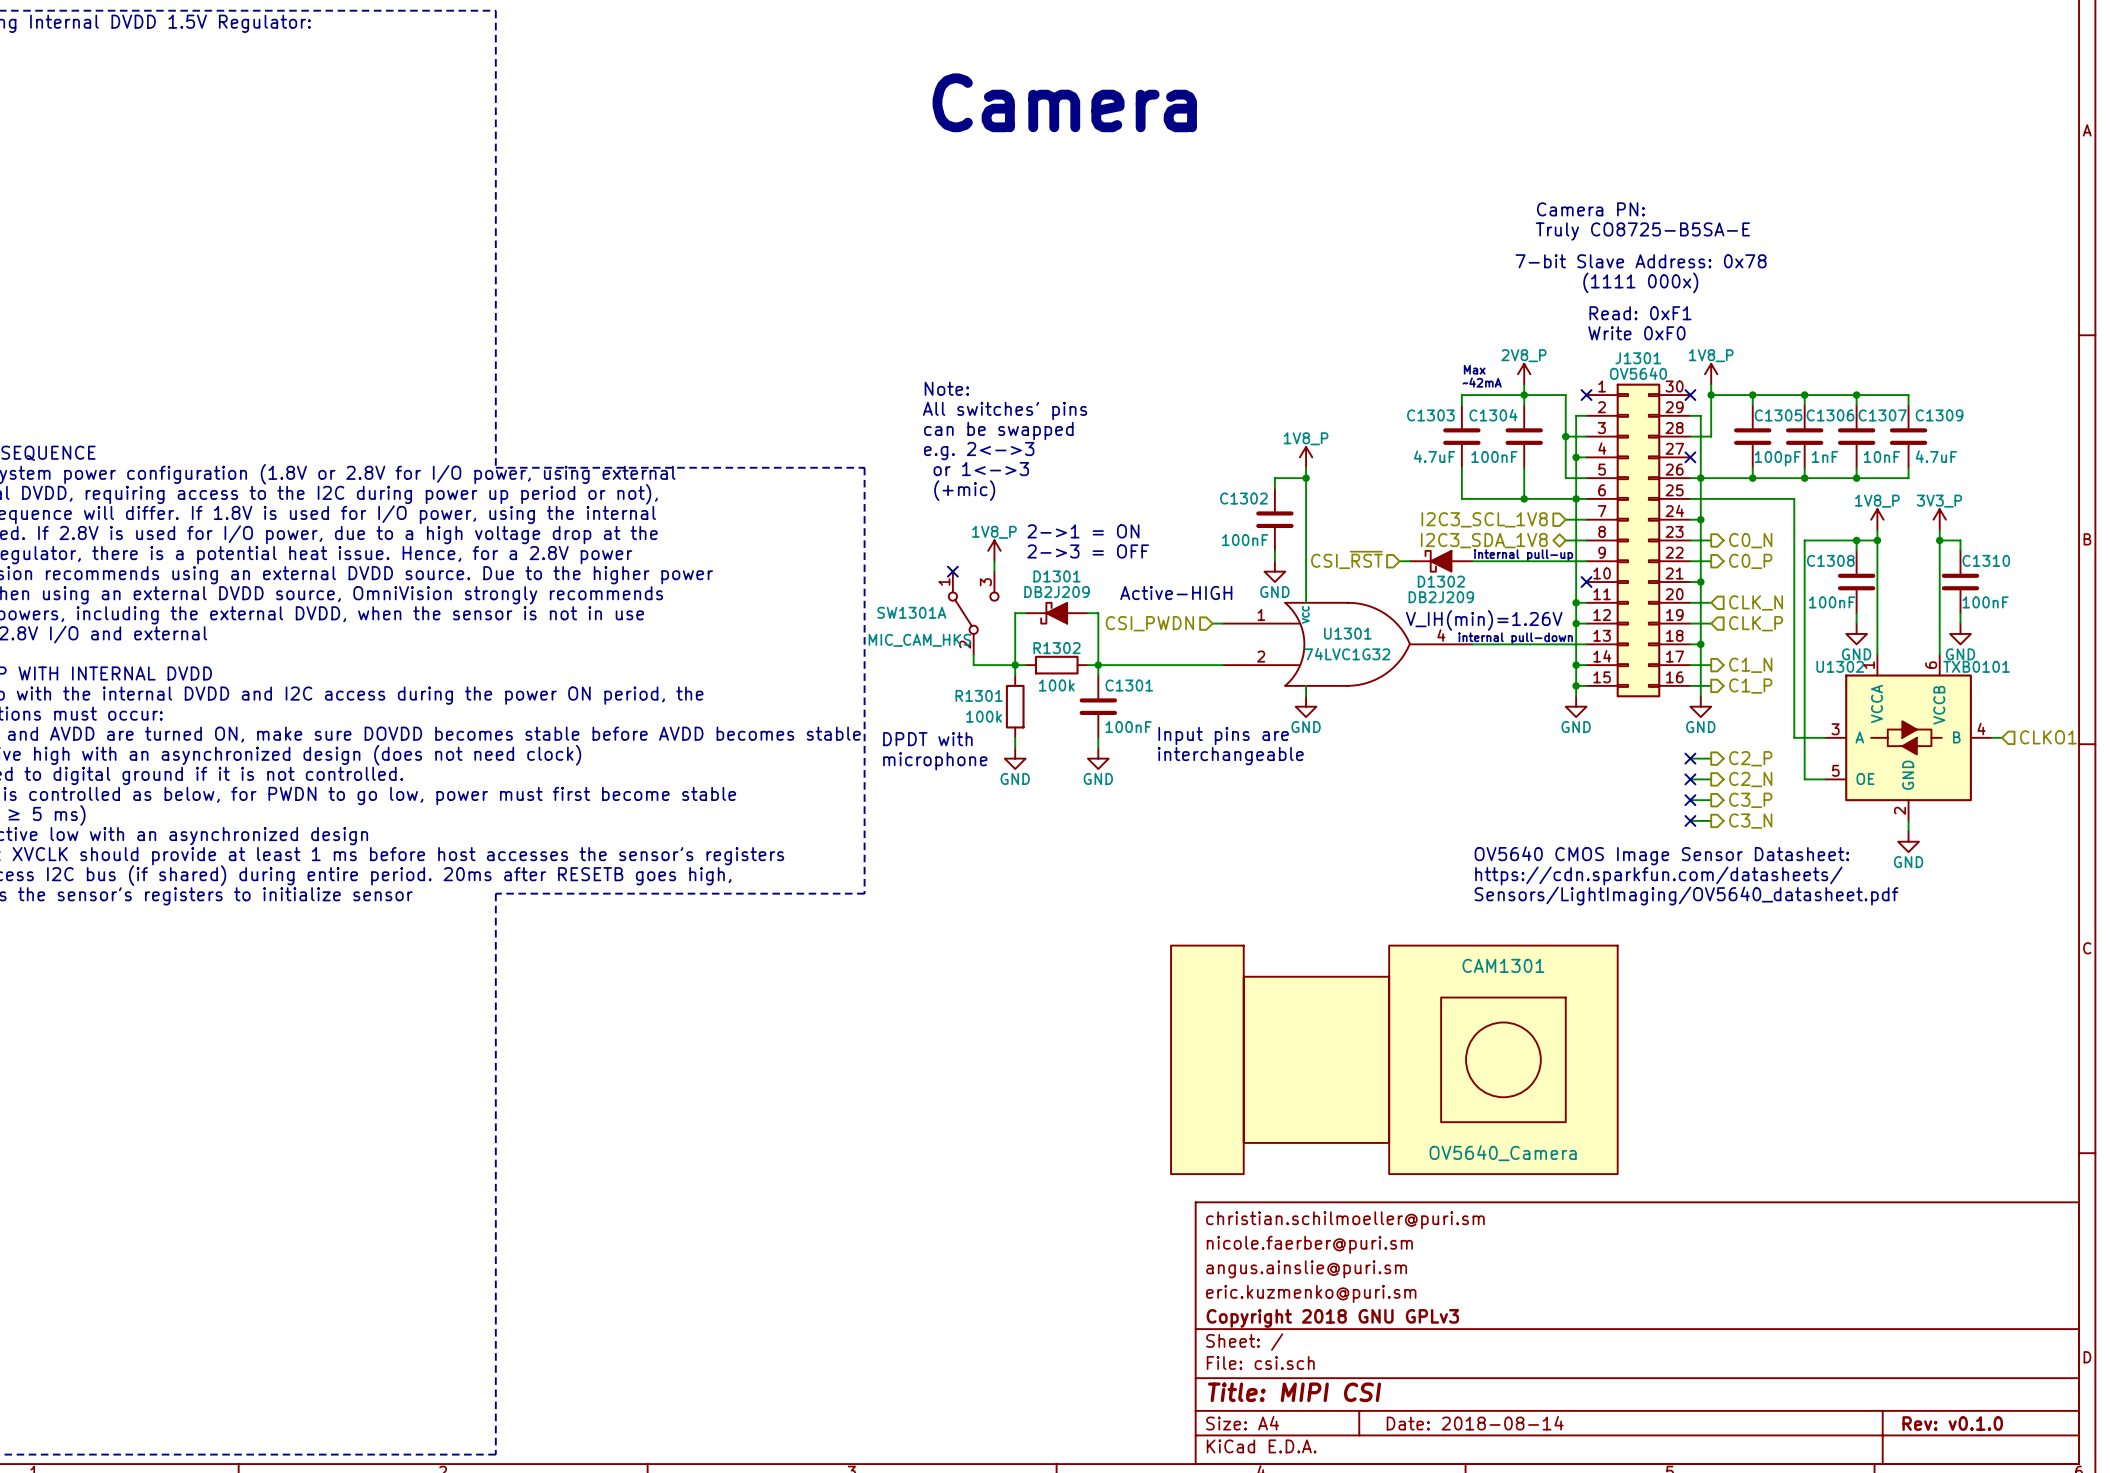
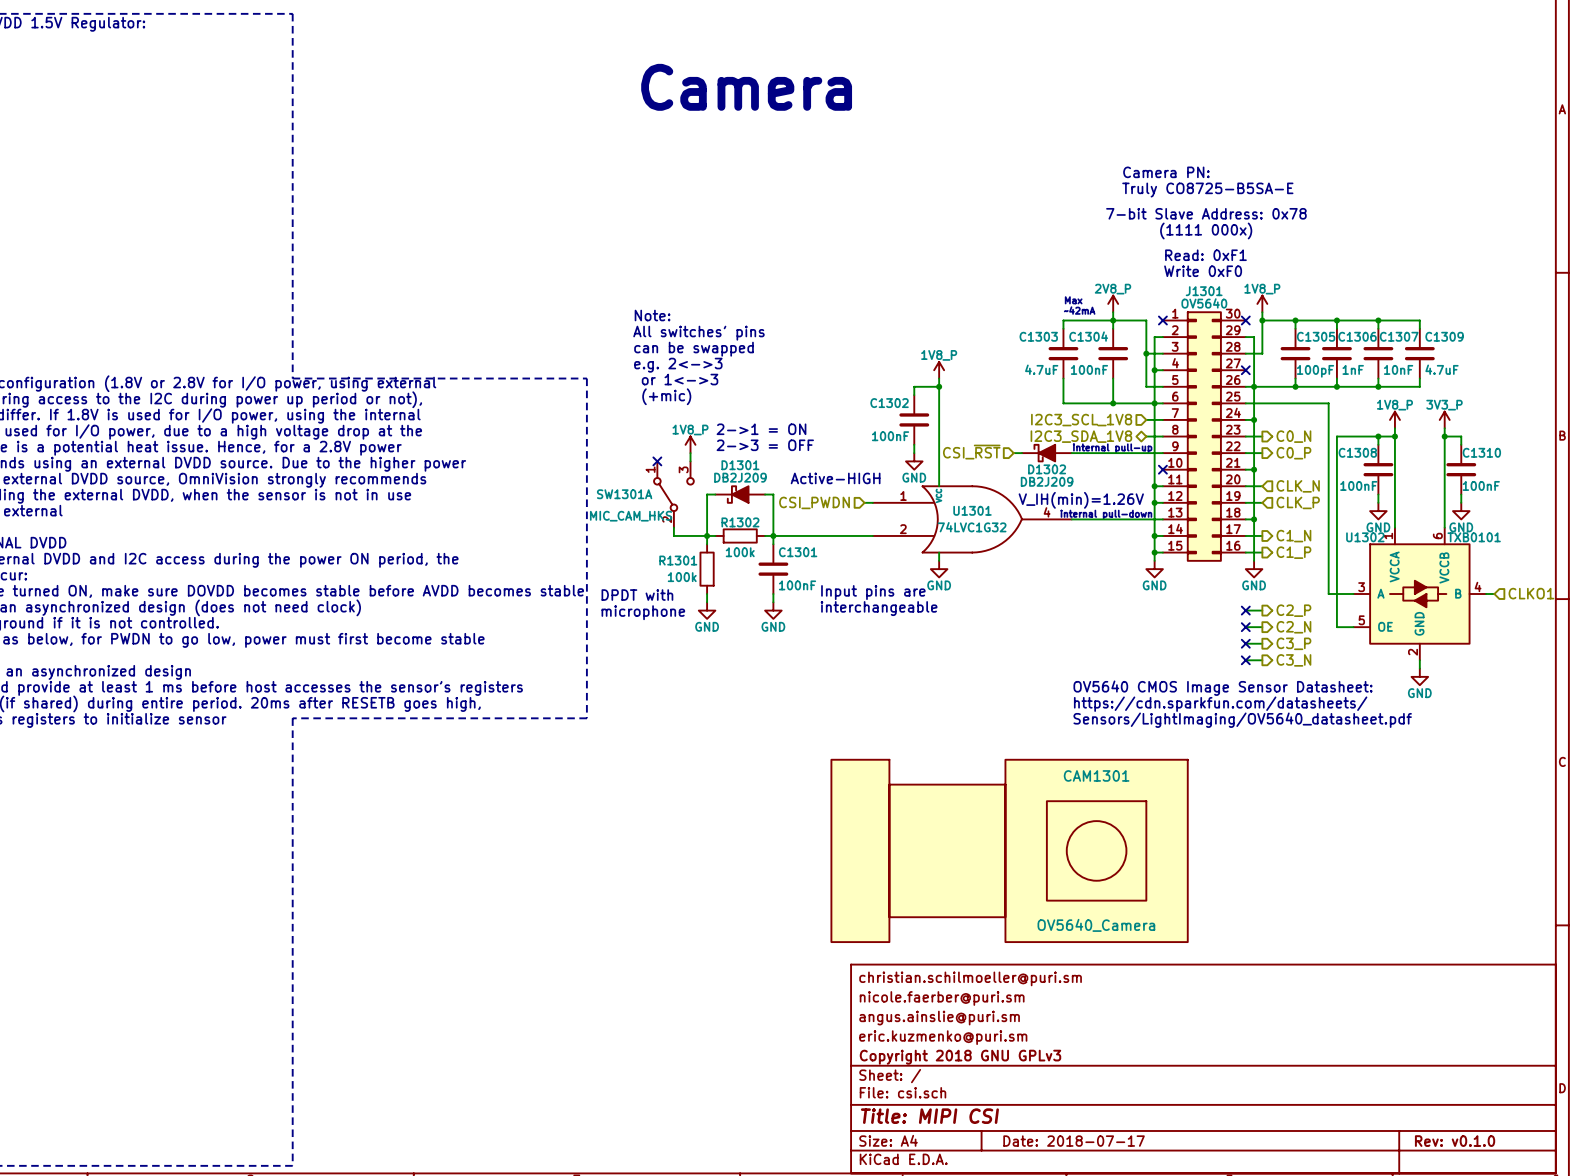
title block: Date: 2018-08-14 (1475, 1423) -> Date: 2018-07-17 (1074, 1141)

